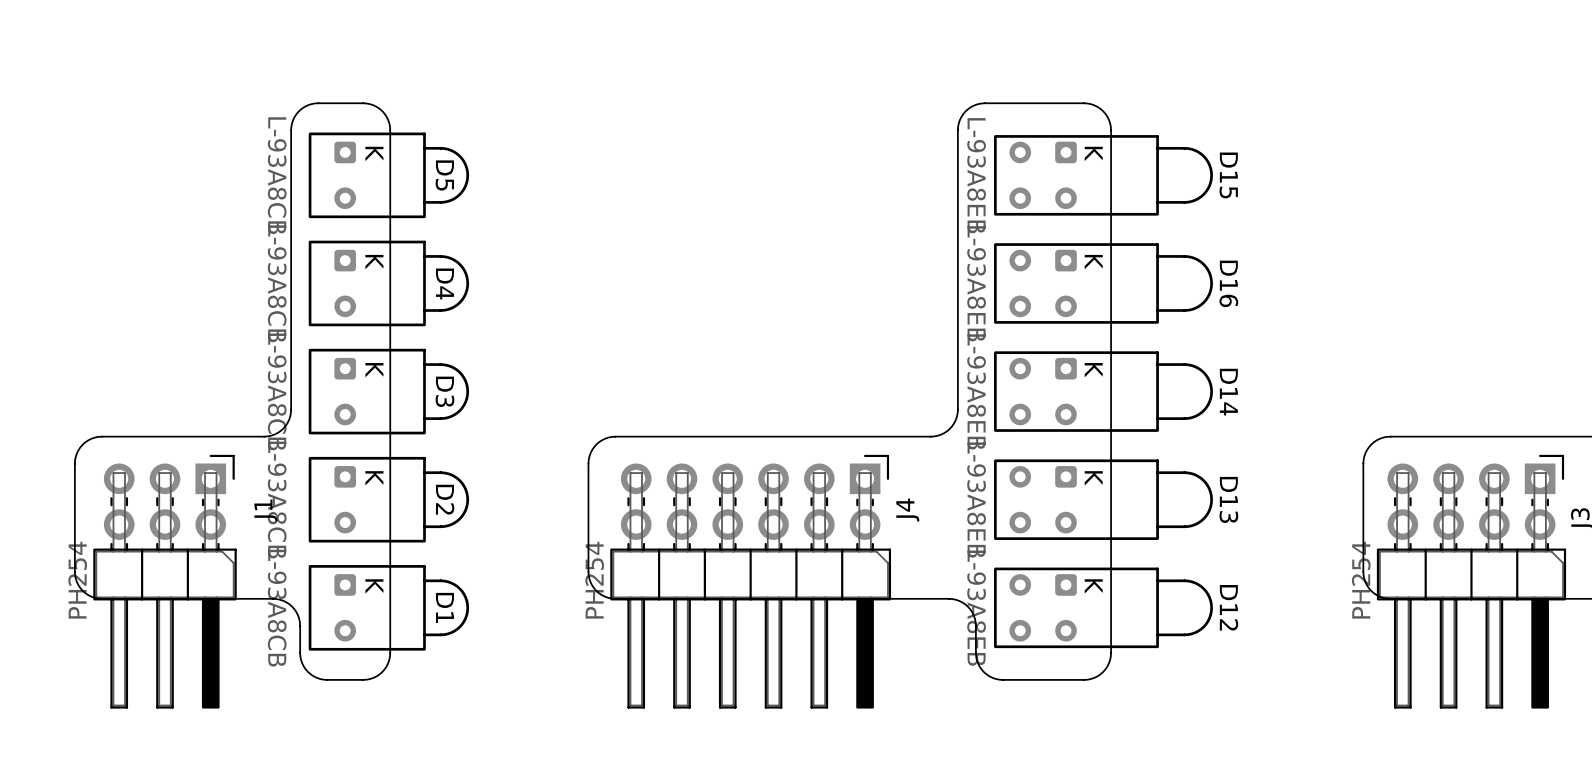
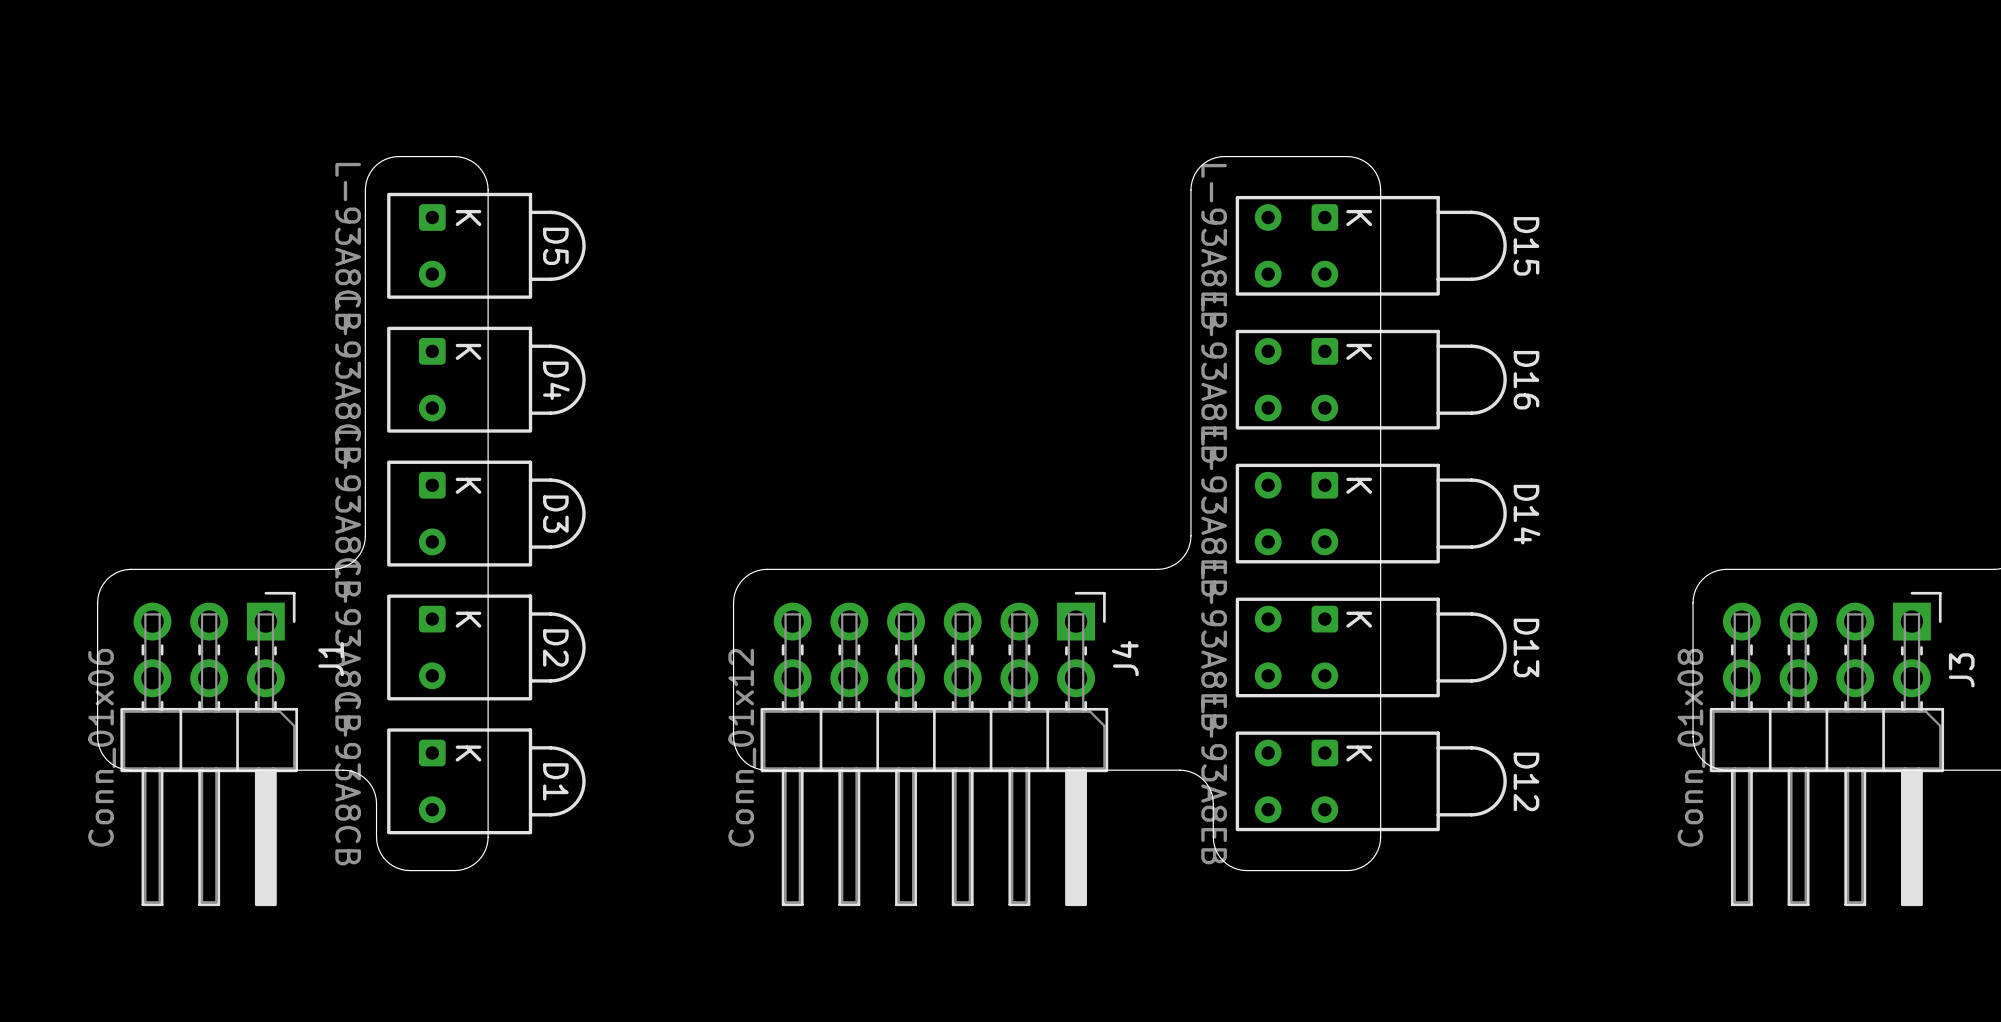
J1 value: PH254 (77, 580) -> Conn_01x06 (102, 747)
J4 value: PH254 (594, 580) -> Conn_01x12 (742, 747)
J3 value: PH254 (1361, 580) -> Conn_01x08 (1691, 747)

